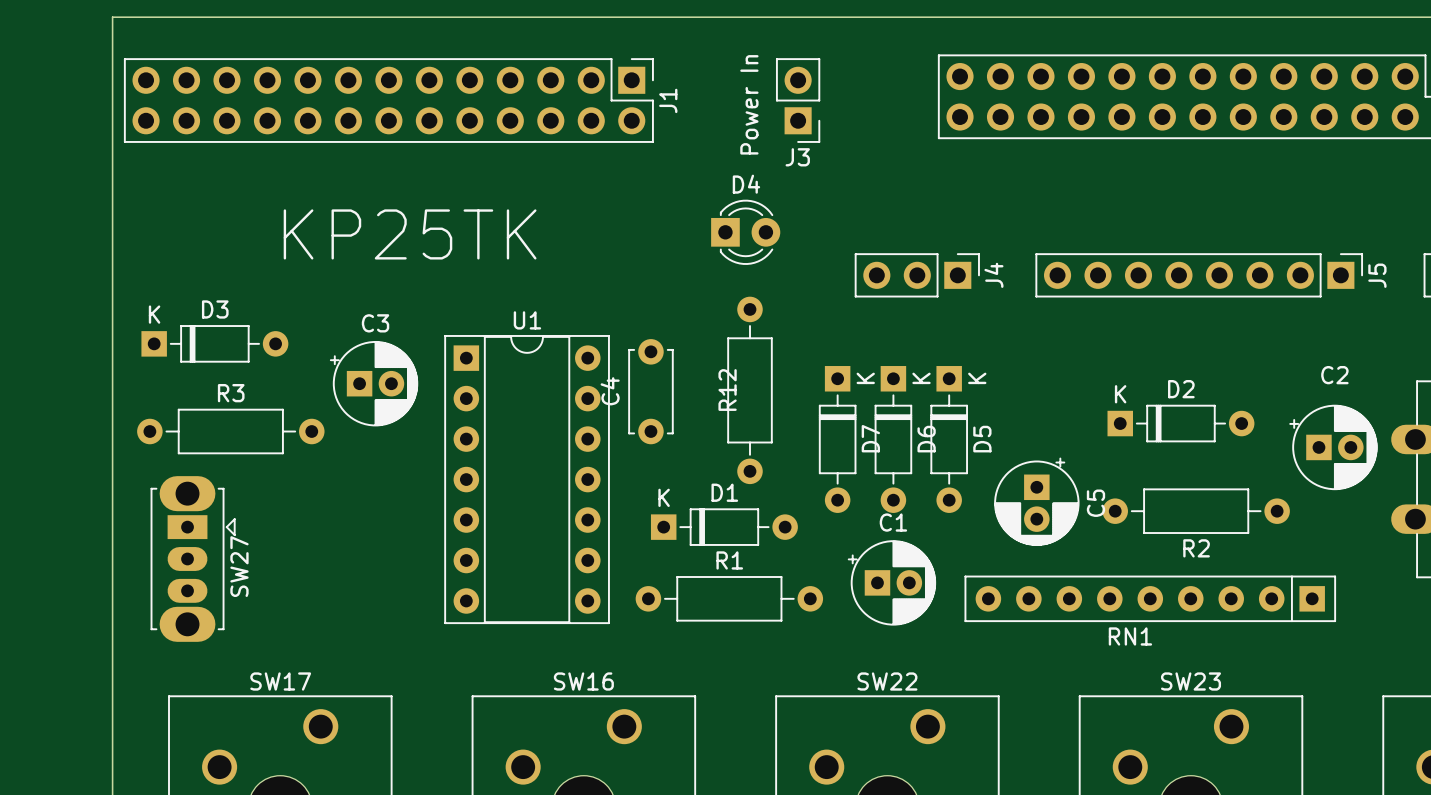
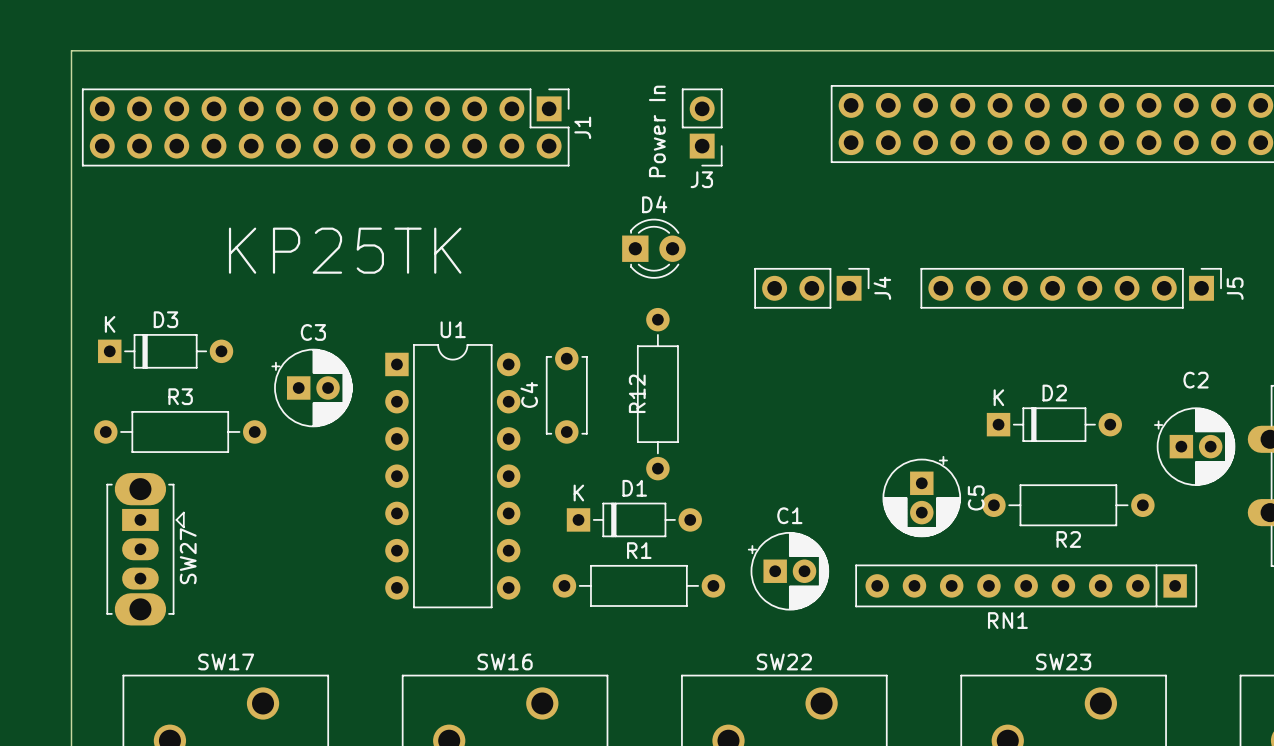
U1 footprint: [444, 335, 610, 625] -> [385, 344, 521, 609]
D7: (837, 439) -> none
D6: (893, 439) -> none
D5: (949, 439) -> none

